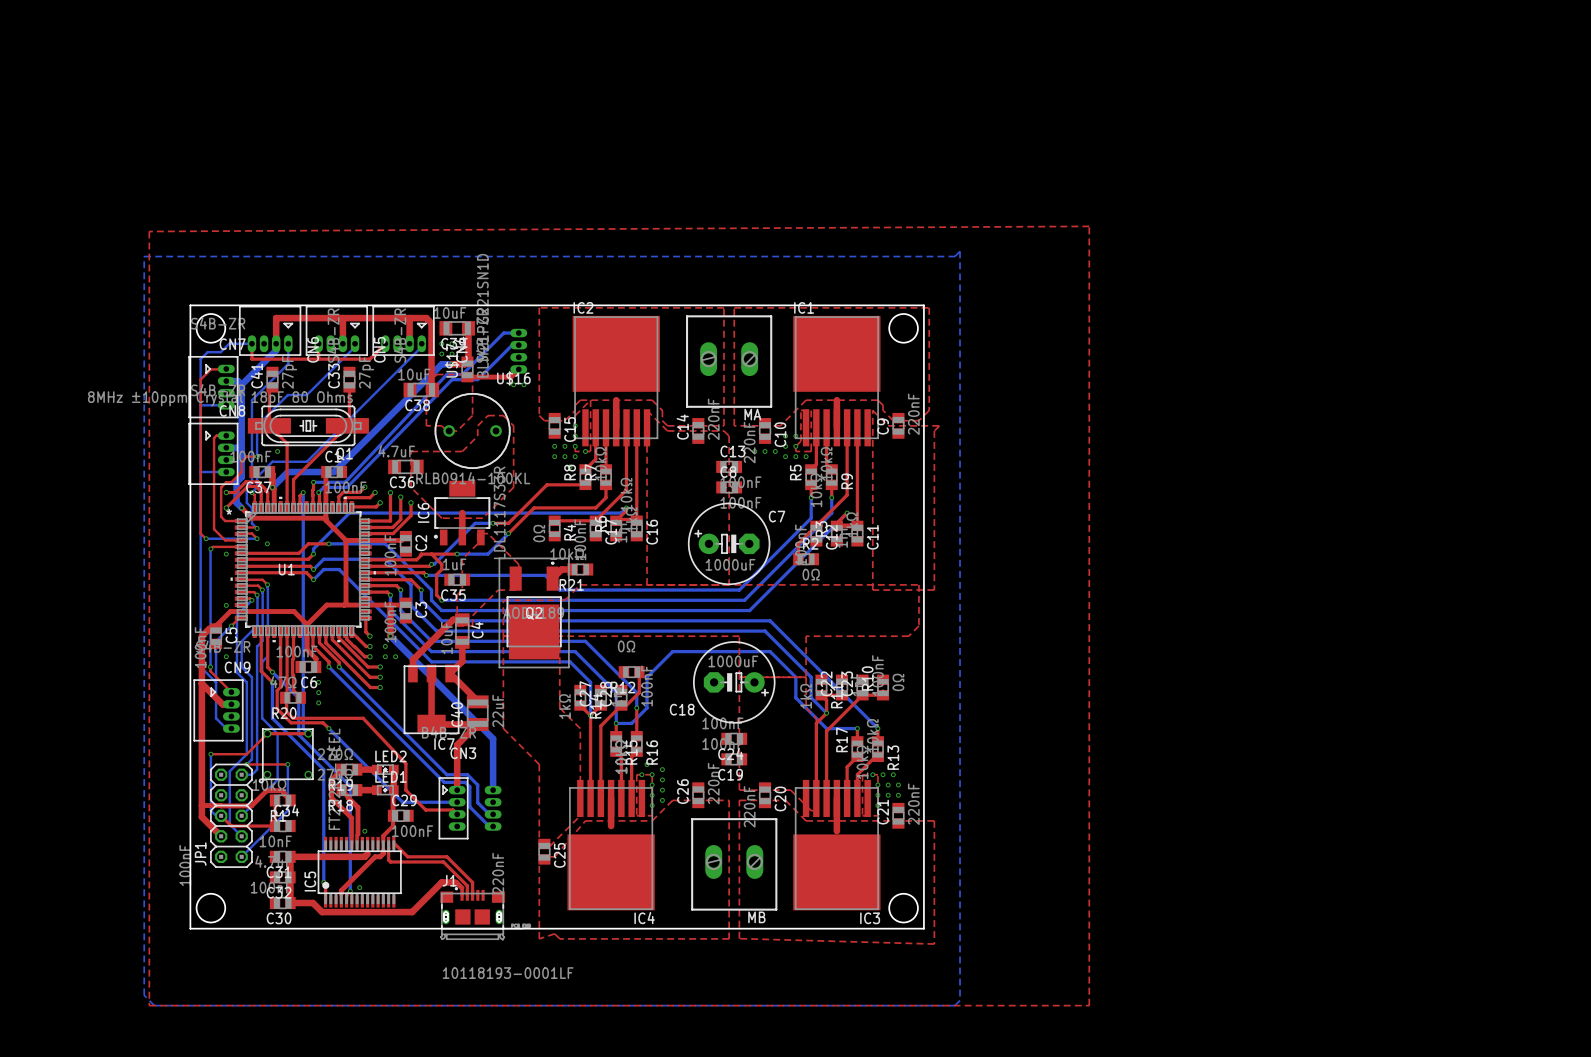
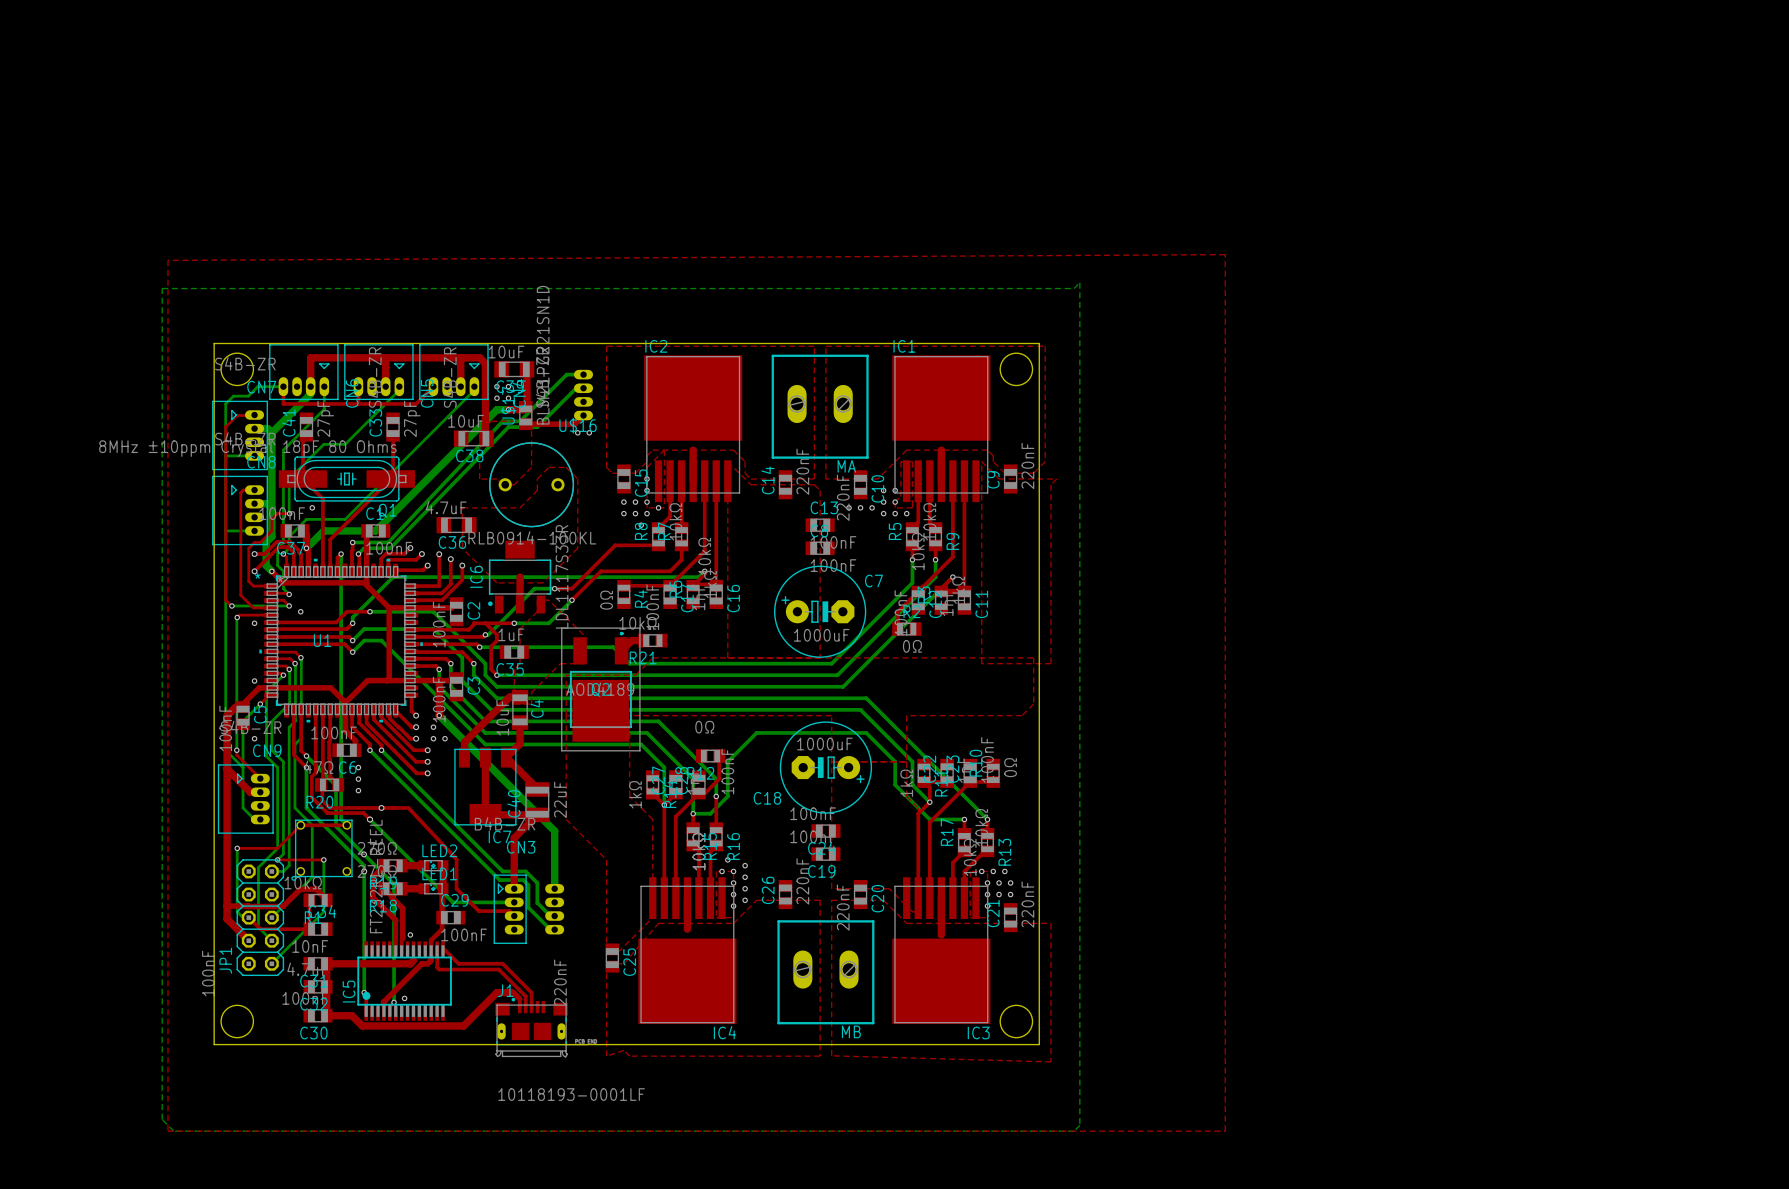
via: none -> (381, 807)
via: none -> (369, 819)
via: none -> (363, 854)
via: none -> (364, 871)

